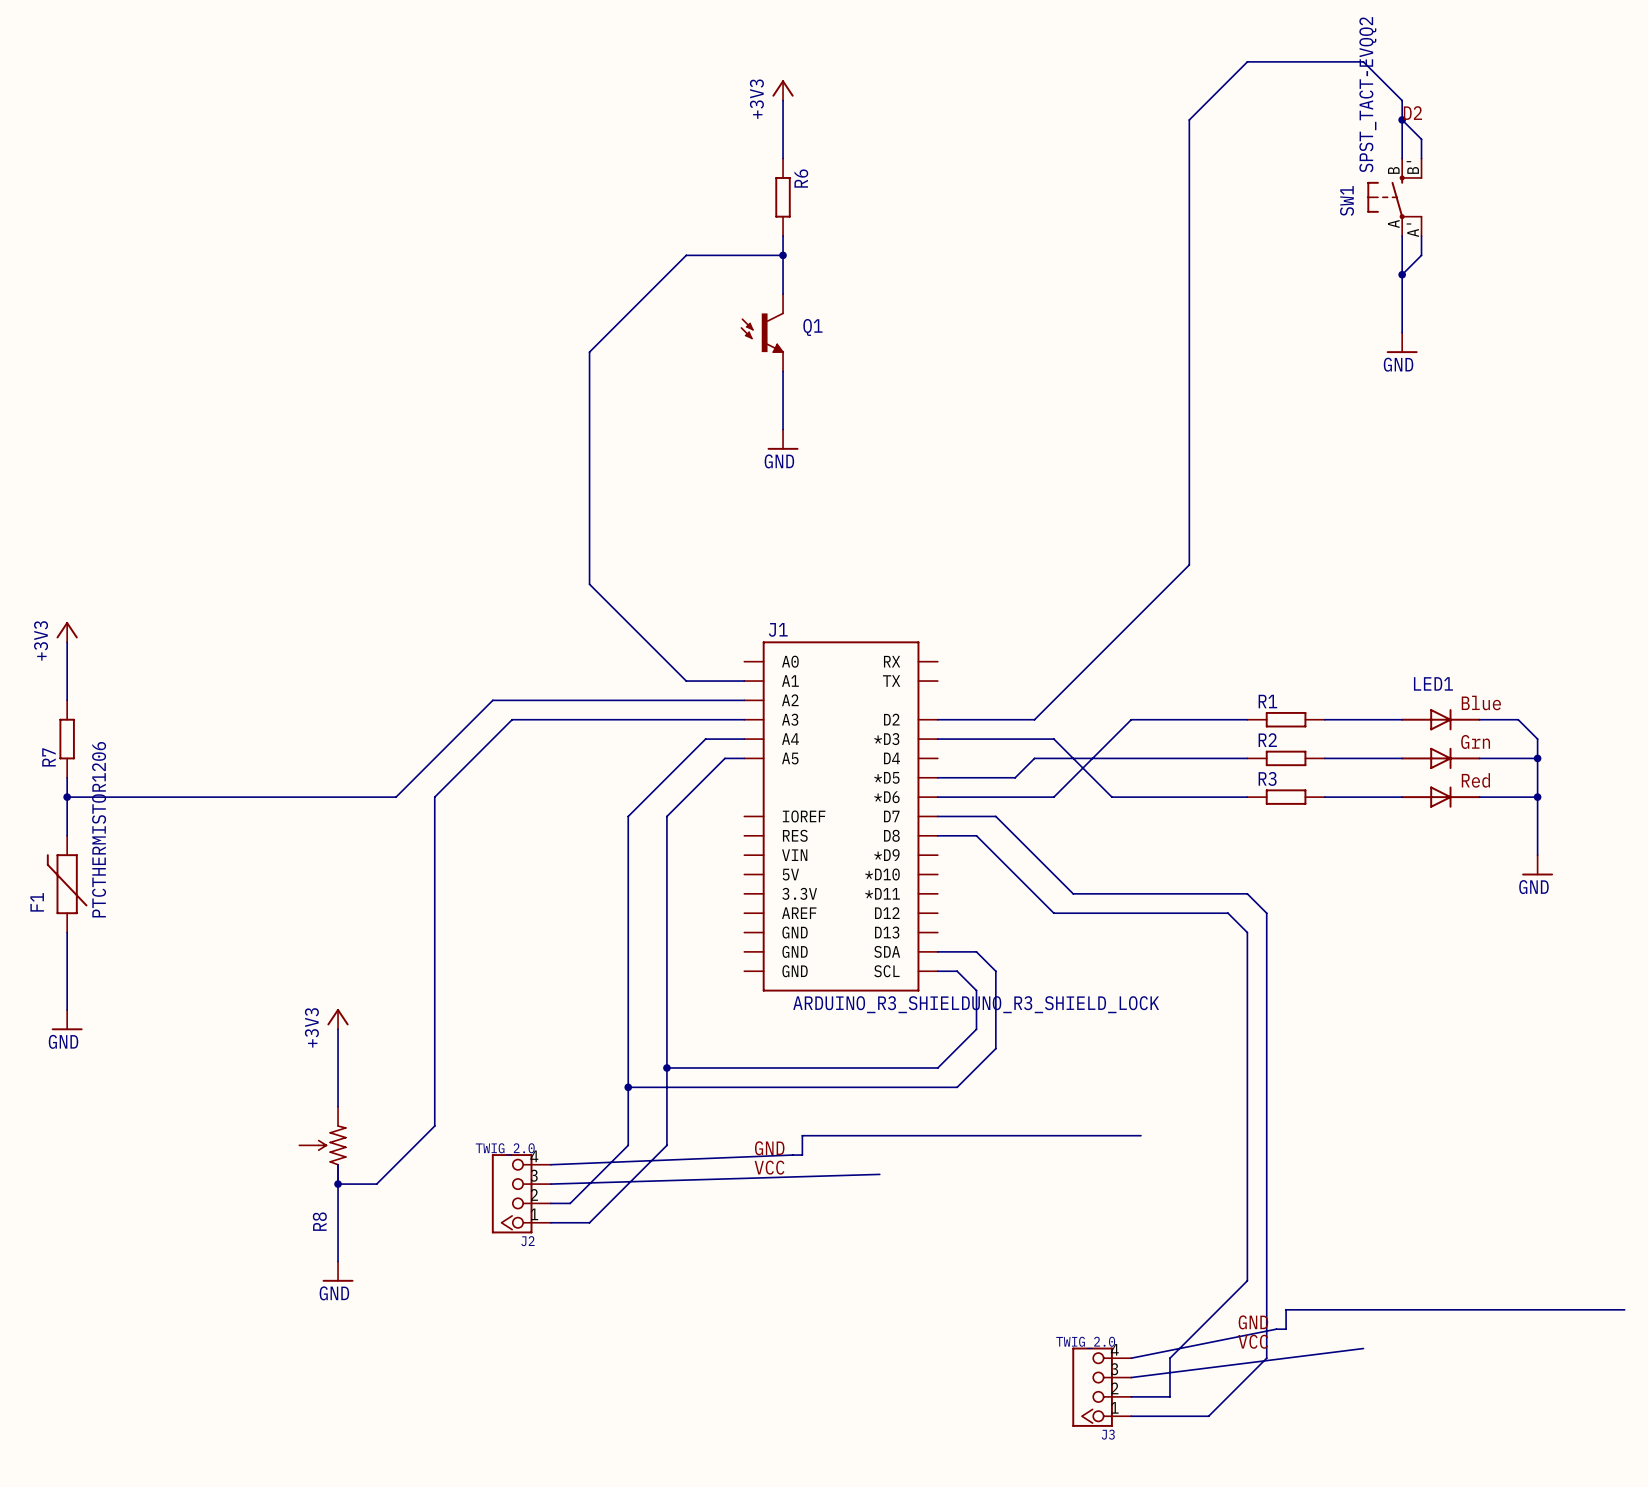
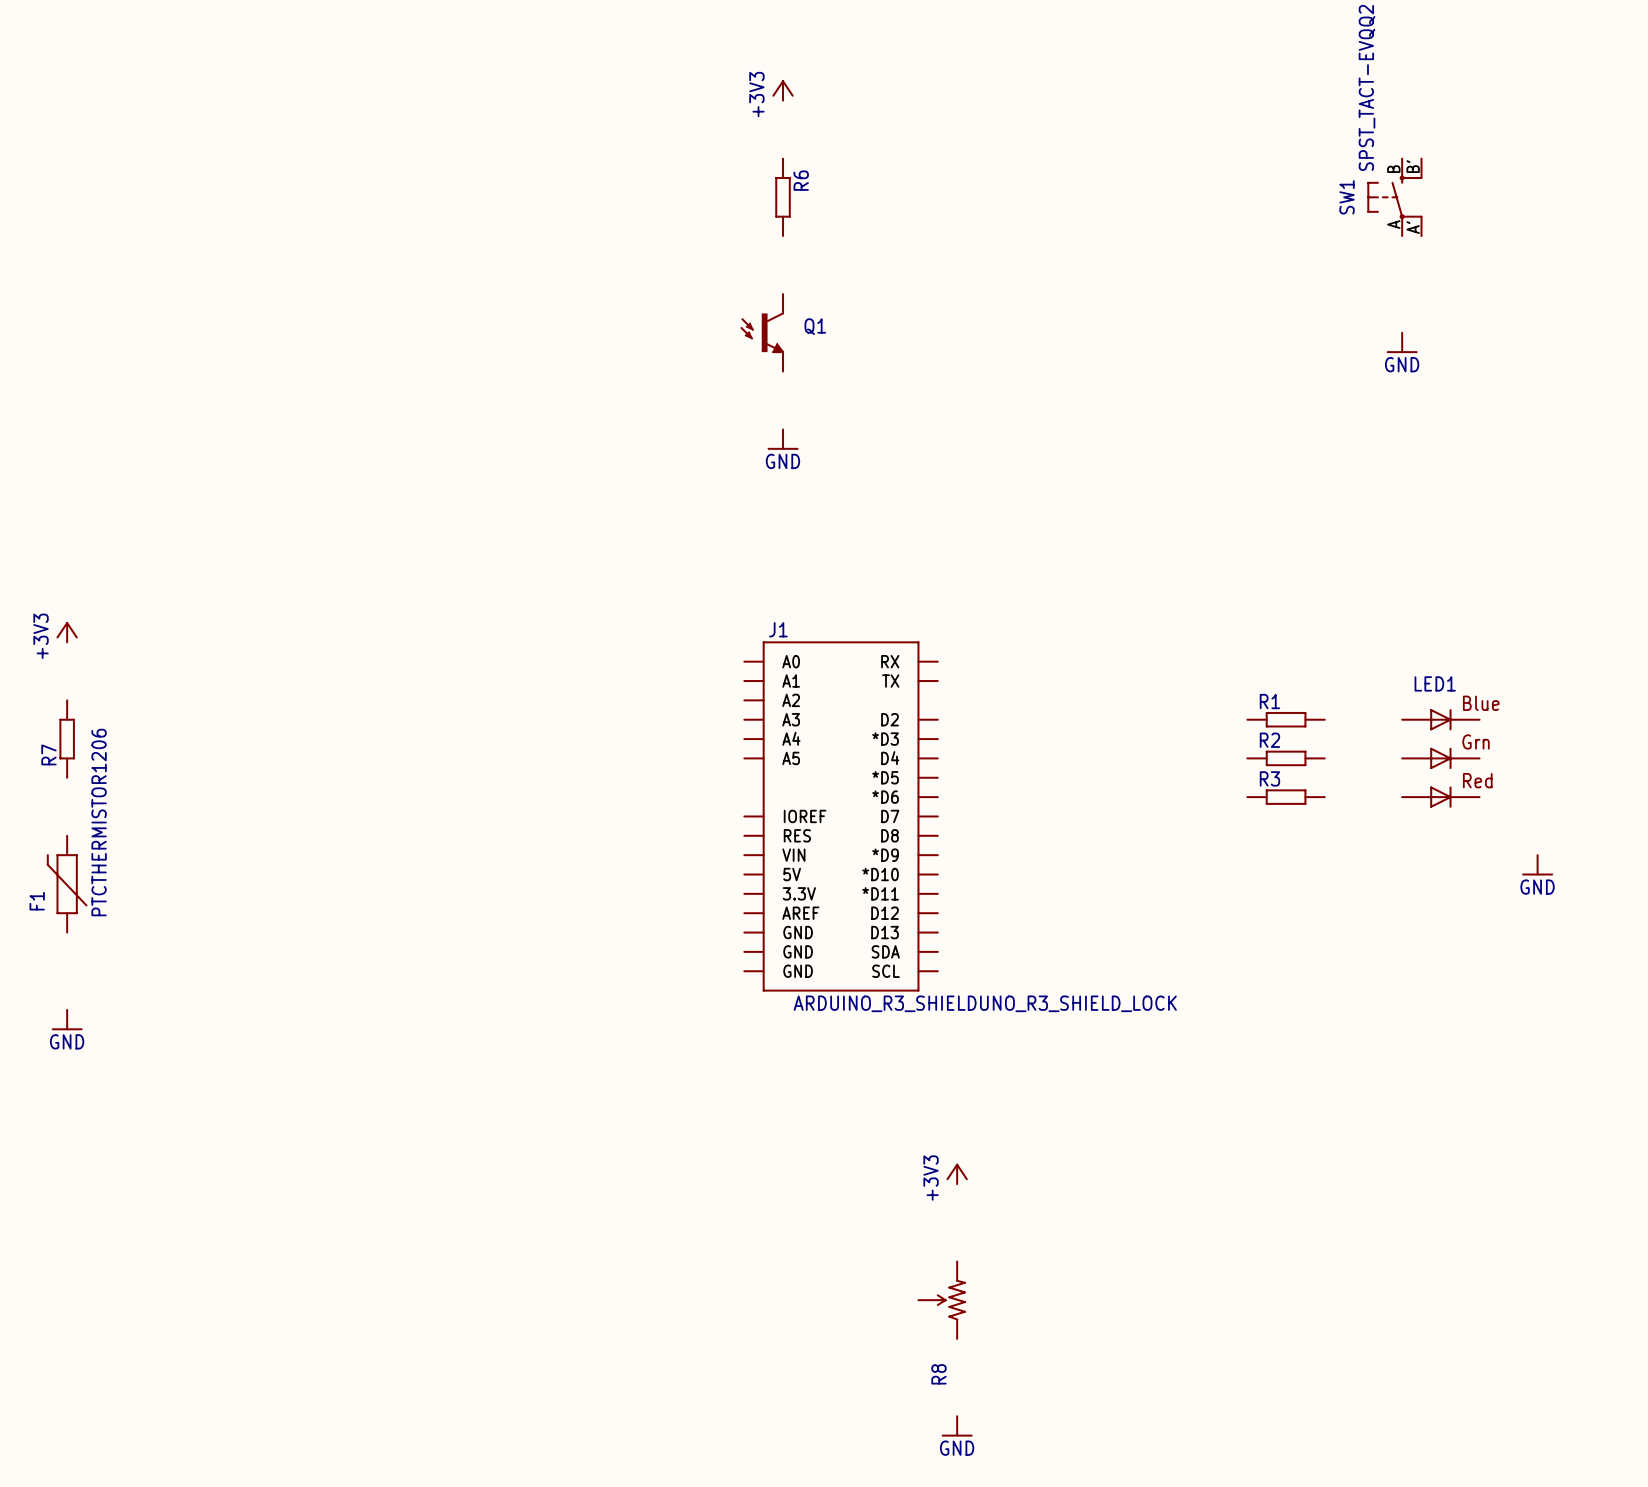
wire: (783, 100) (783, 158) -> none
label: D2 (1412, 113) -> none
wire: (1402, 119) (1421, 139) (1421, 158) -> none
junction: (1402, 119) -> none
wire: (1402, 158) (1402, 100) (1363, 61) (1247, 61) (1189, 119) (1189, 564) (1034, 719) (937, 719) -> none
wire: (783, 236) (783, 294) -> none
wire: (1402, 236) (1402, 332) -> none
wire: (1421, 236) (1421, 255) (1402, 274) -> none
wire: (783, 255) (686, 255) (589, 352) (589, 584) (686, 681) (744, 681) -> none
junction: (783, 255) -> none
junction: (1402, 274) -> none
wire: (783, 371) (783, 429) -> none
wire: (67, 642) (67, 700) -> none
wire: (744, 700) (492, 700) (396, 797) (67, 797) -> none
wire: (744, 719) (512, 719) (434, 797) (434, 1126) (376, 1184) (338, 1184) -> none
wire: (1247, 719) (1131, 719) (1053, 797) (937, 797) -> none
wire: (1324, 719) (1402, 719) -> none
wire: (1479, 719) (1518, 719) (1537, 739) (1537, 855) -> none
wire: (744, 739) (705, 739) (628, 816) (628, 1145) (570, 1203) (550, 1203) -> none
wire: (937, 739) (1053, 739) (1111, 797) (1247, 797) -> none
wire: (744, 758) (724, 758) (666, 816) (666, 1145) (589, 1222) (550, 1222) -> none
wire: (1247, 758) (1034, 758) (1015, 777) (937, 777) -> none
wire: (1324, 758) (1402, 758) -> none
wire: (1479, 758) (1537, 758) -> none
junction: (1537, 758) -> none
wire: (67, 777) (67, 835) -> none
junction: (67, 797) -> none
wire: (1324, 797) (1402, 797) -> none
wire: (1479, 797) (1537, 797) -> none
junction: (1537, 797) -> none
wire: (937, 816) (995, 816) (1073, 893) (1247, 893) (1266, 913) (1266, 1358) (1208, 1416) (1131, 1416) -> none
wire: (937, 835) (976, 835) (1053, 913) (1228, 913) (1247, 932) (1247, 1280) (1169, 1358) (1169, 1396) (1131, 1396) -> none
wire: (67, 932) (67, 1009) -> none
wire: (937, 951) (976, 951) (995, 971) (995, 1048) (957, 1087) (628, 1087) -> none
wire: (937, 971) (957, 971) (976, 990) (976, 1029) (937, 1067) (666, 1067) -> none
power symbol: +3V3 (338, 1019) -> none
wire: (338, 1029) (338, 1106) -> none
junction: (666, 1067) -> none
junction: (628, 1087) -> none
wire: (1140, 1135) (802, 1135) (802, 1155) (550, 1164) -> none
R8 position: (322, 1145) -> (941, 1300)
label: GND (769, 1148) -> none
wire: (338, 1164) (338, 1261) -> none
label: VCC (769, 1167) -> none
power symbol: none -> +3V3 (957, 1173)
wire: (879, 1174) (550, 1184) -> none
junction: (338, 1184) -> none
J2: TWIG_2.0 (521, 1193) -> none
power symbol: GND (338, 1271) -> none
wire: (1624, 1309) (1286, 1309) (1286, 1329) (1276, 1329) (1131, 1358) -> none
label: GND (1253, 1322) -> none
label: VCC (1253, 1341) -> none
wire: (1363, 1348) (1131, 1377) -> none
J3: TWIG_2.0 (1101, 1387) -> none
power symbol: none -> GND (957, 1426)

